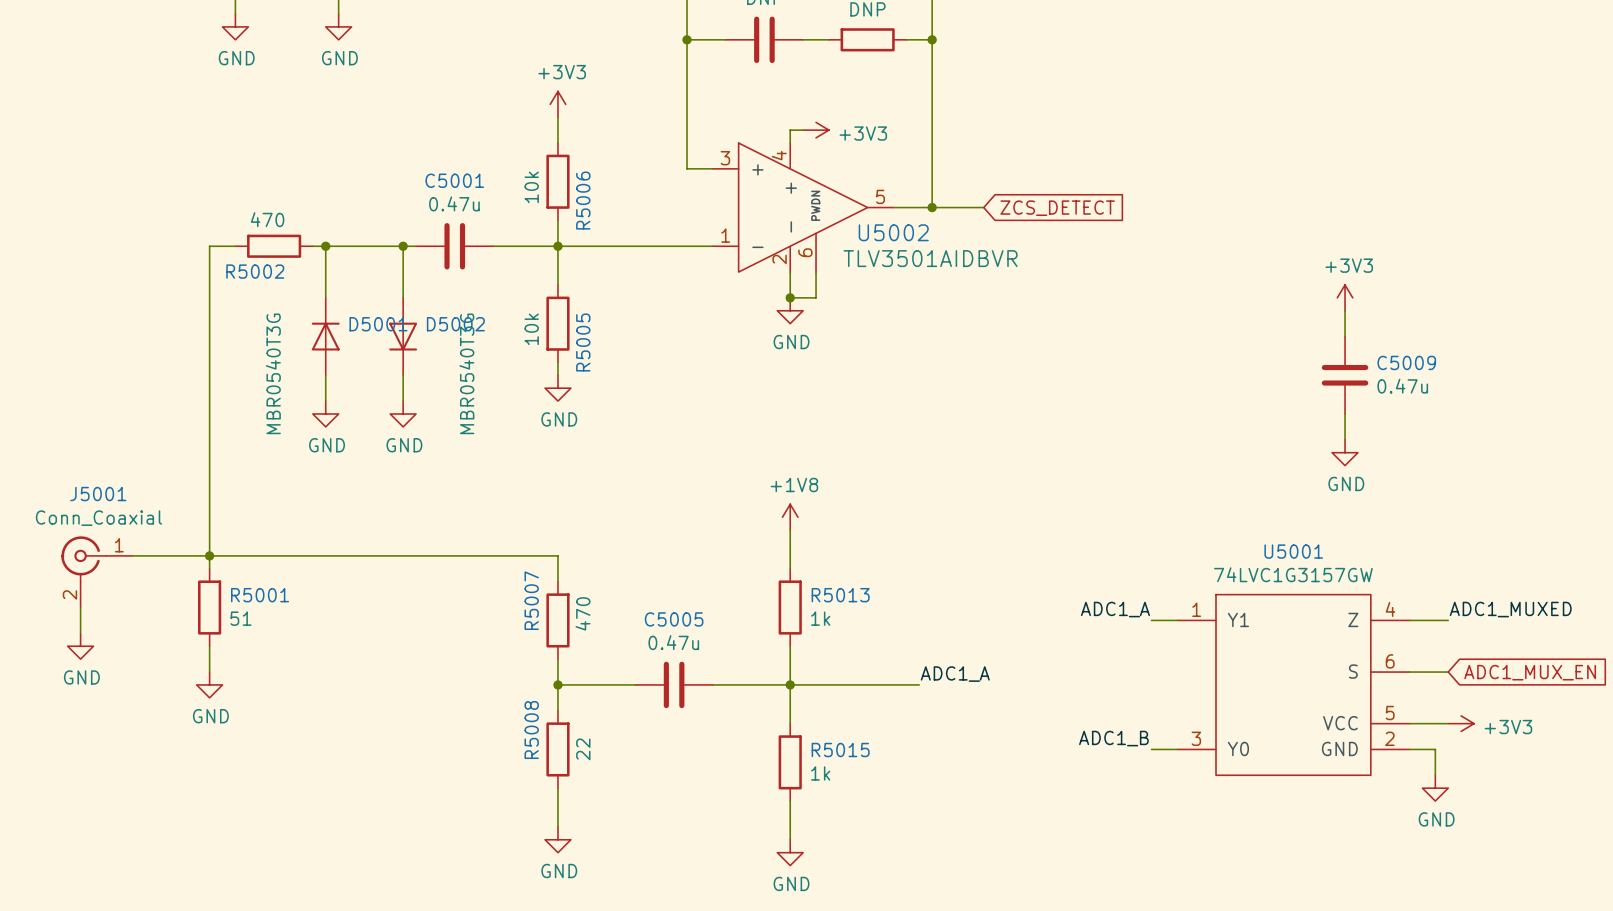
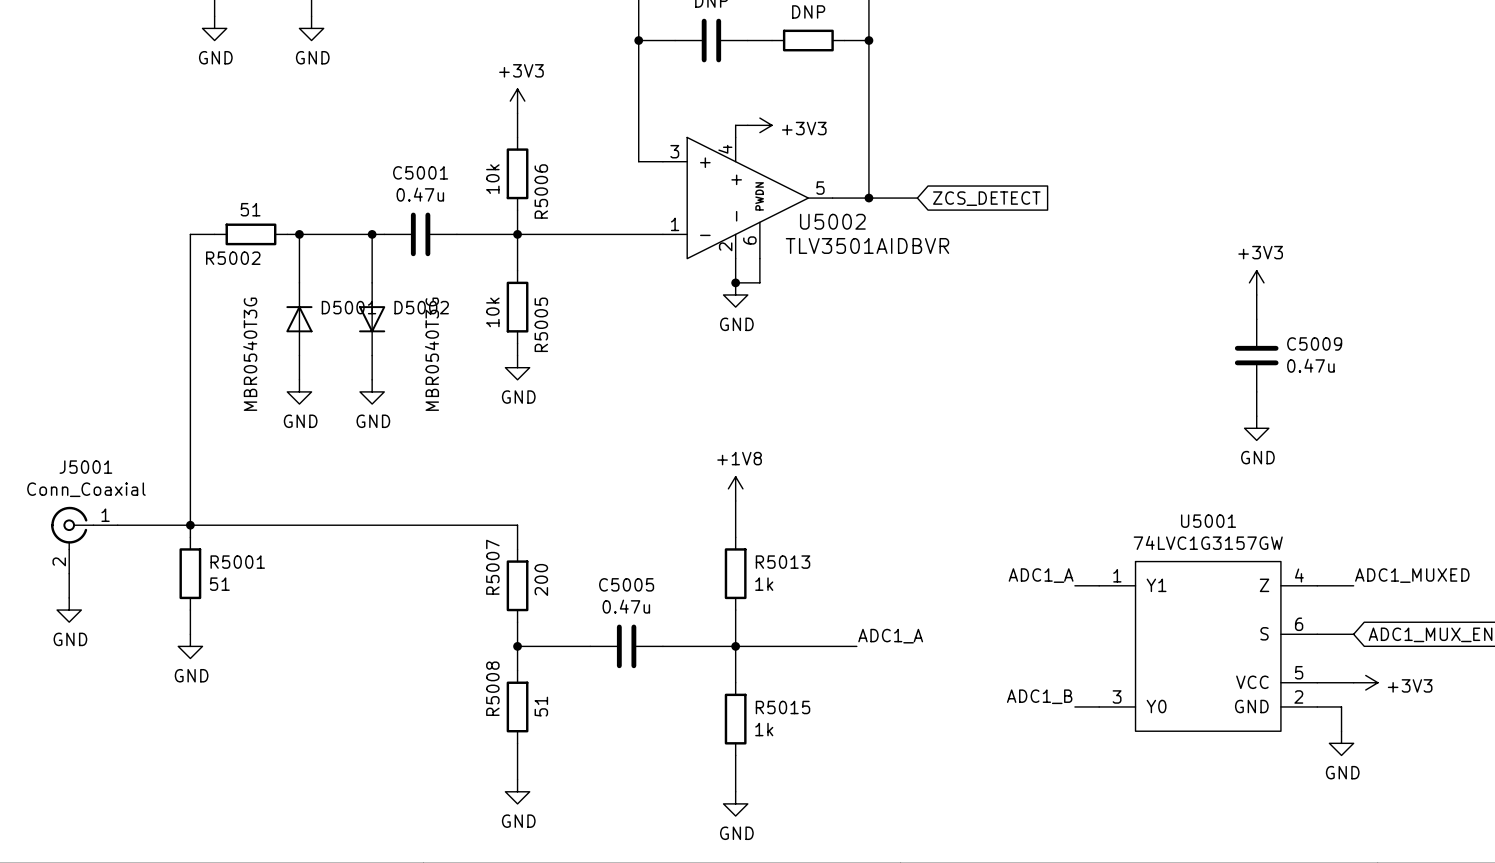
R5002 value: 470 (267, 219) -> 51 (250, 209)
R5007 value: 470 (582, 613) -> 200 (541, 579)
R5008 value: 22 (583, 749) -> 51 (541, 706)

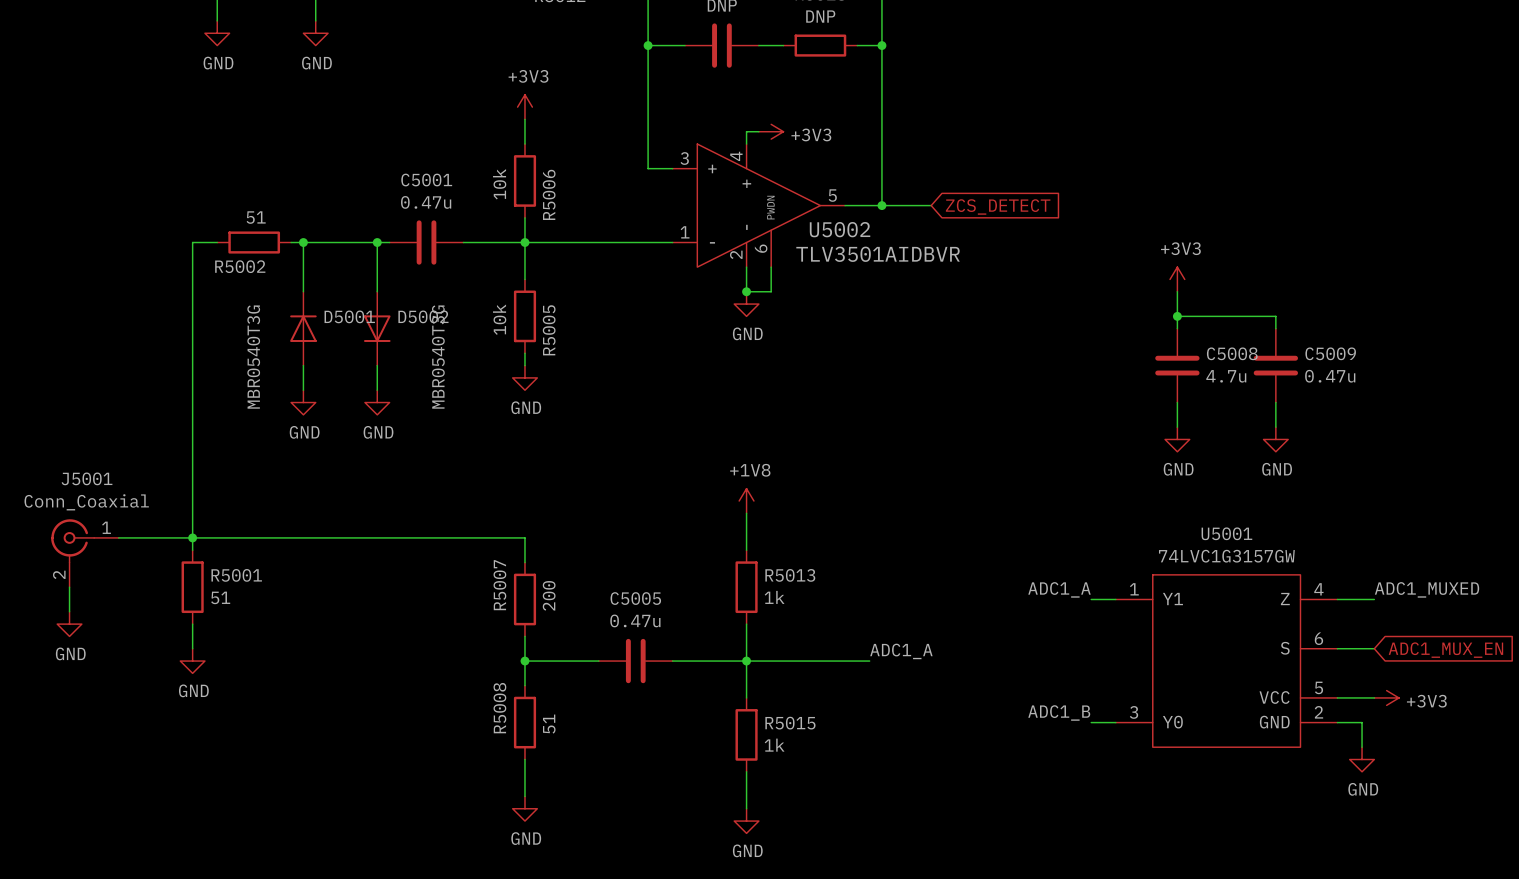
wire: none -> (1177, 291) (1177, 328)
power symbol position: +3V3 (1256, 282) -> +3V3 (1177, 279)
wire: (1256, 294) (1256, 307) -> (1177, 316) (1275, 316)
junction: none -> (1177, 316)
C5008: none -> 4.7u (1177, 365)
wire: none -> (1177, 402) (1177, 427)
power symbol: none -> GND (1177, 439)

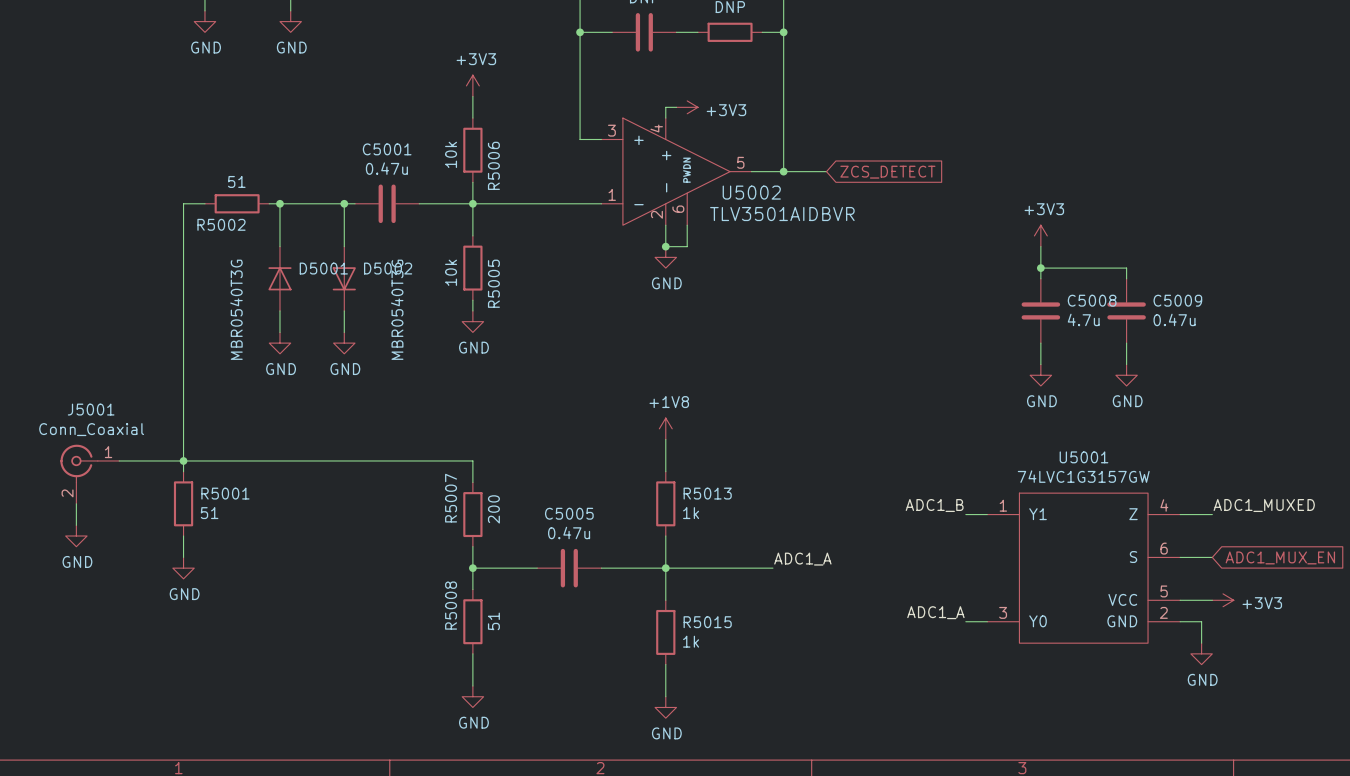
label: ADC1_A (1059, 589) -> ADC1_B (934, 505)
label: ADC1_B (1059, 712) -> ADC1_A (935, 612)

